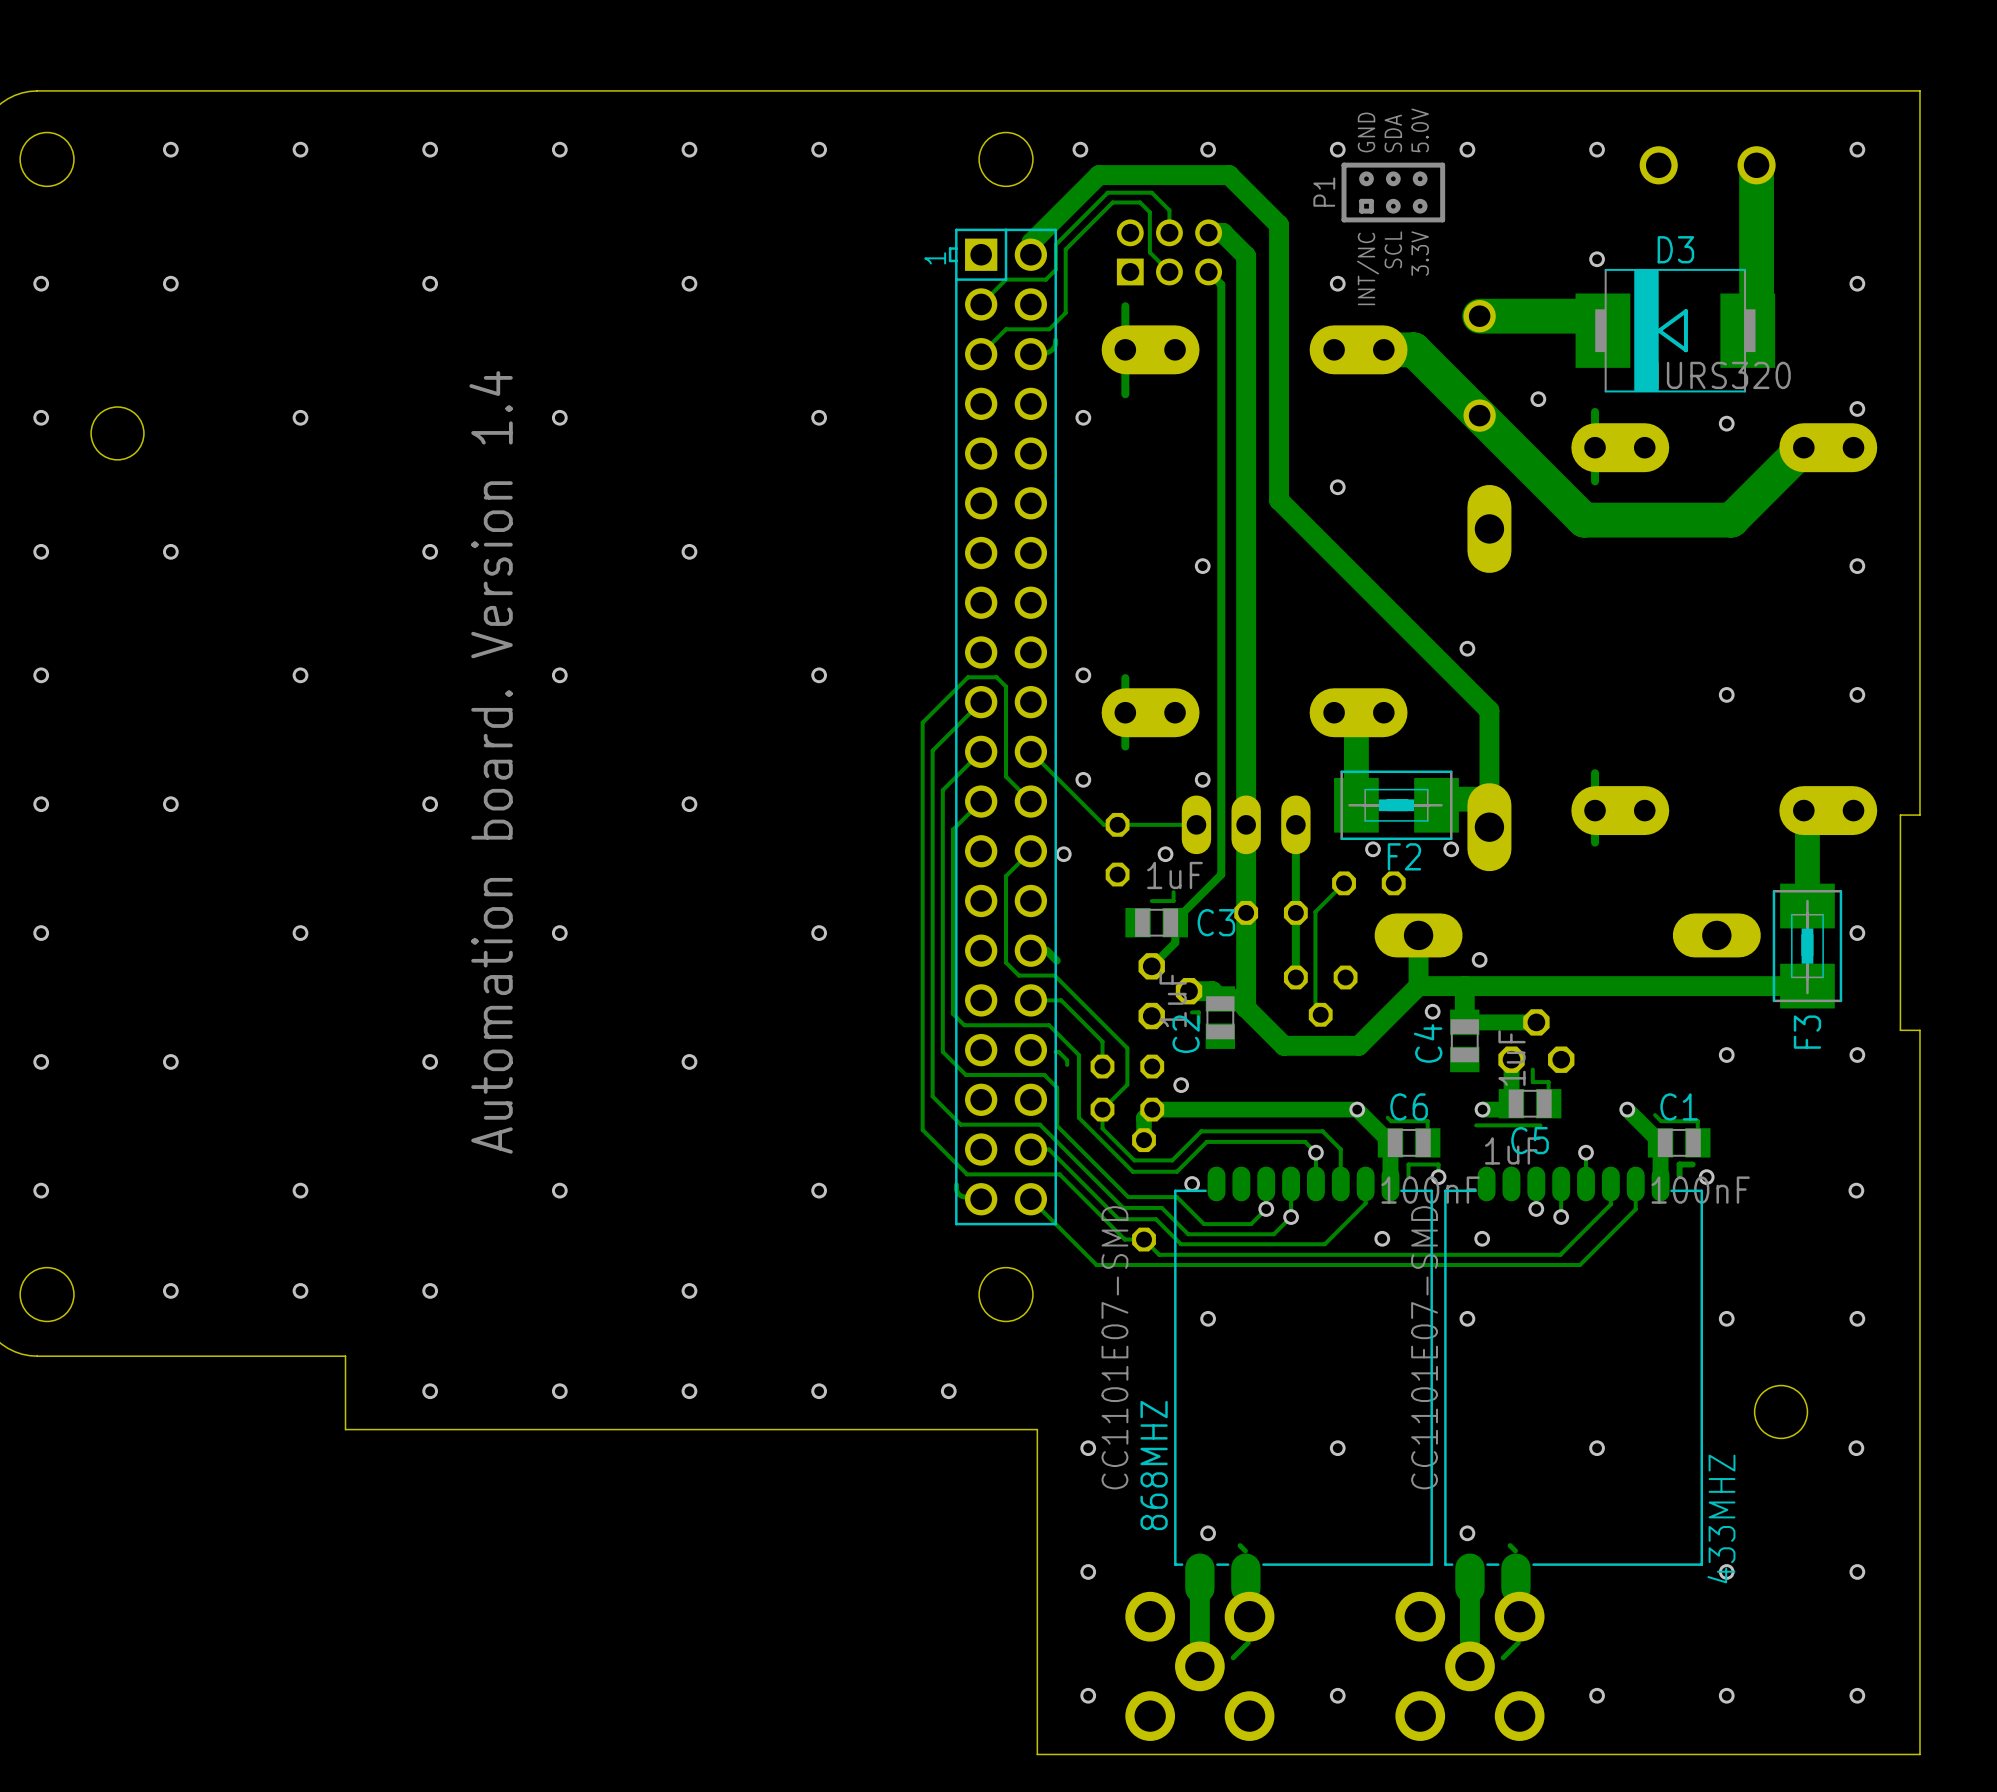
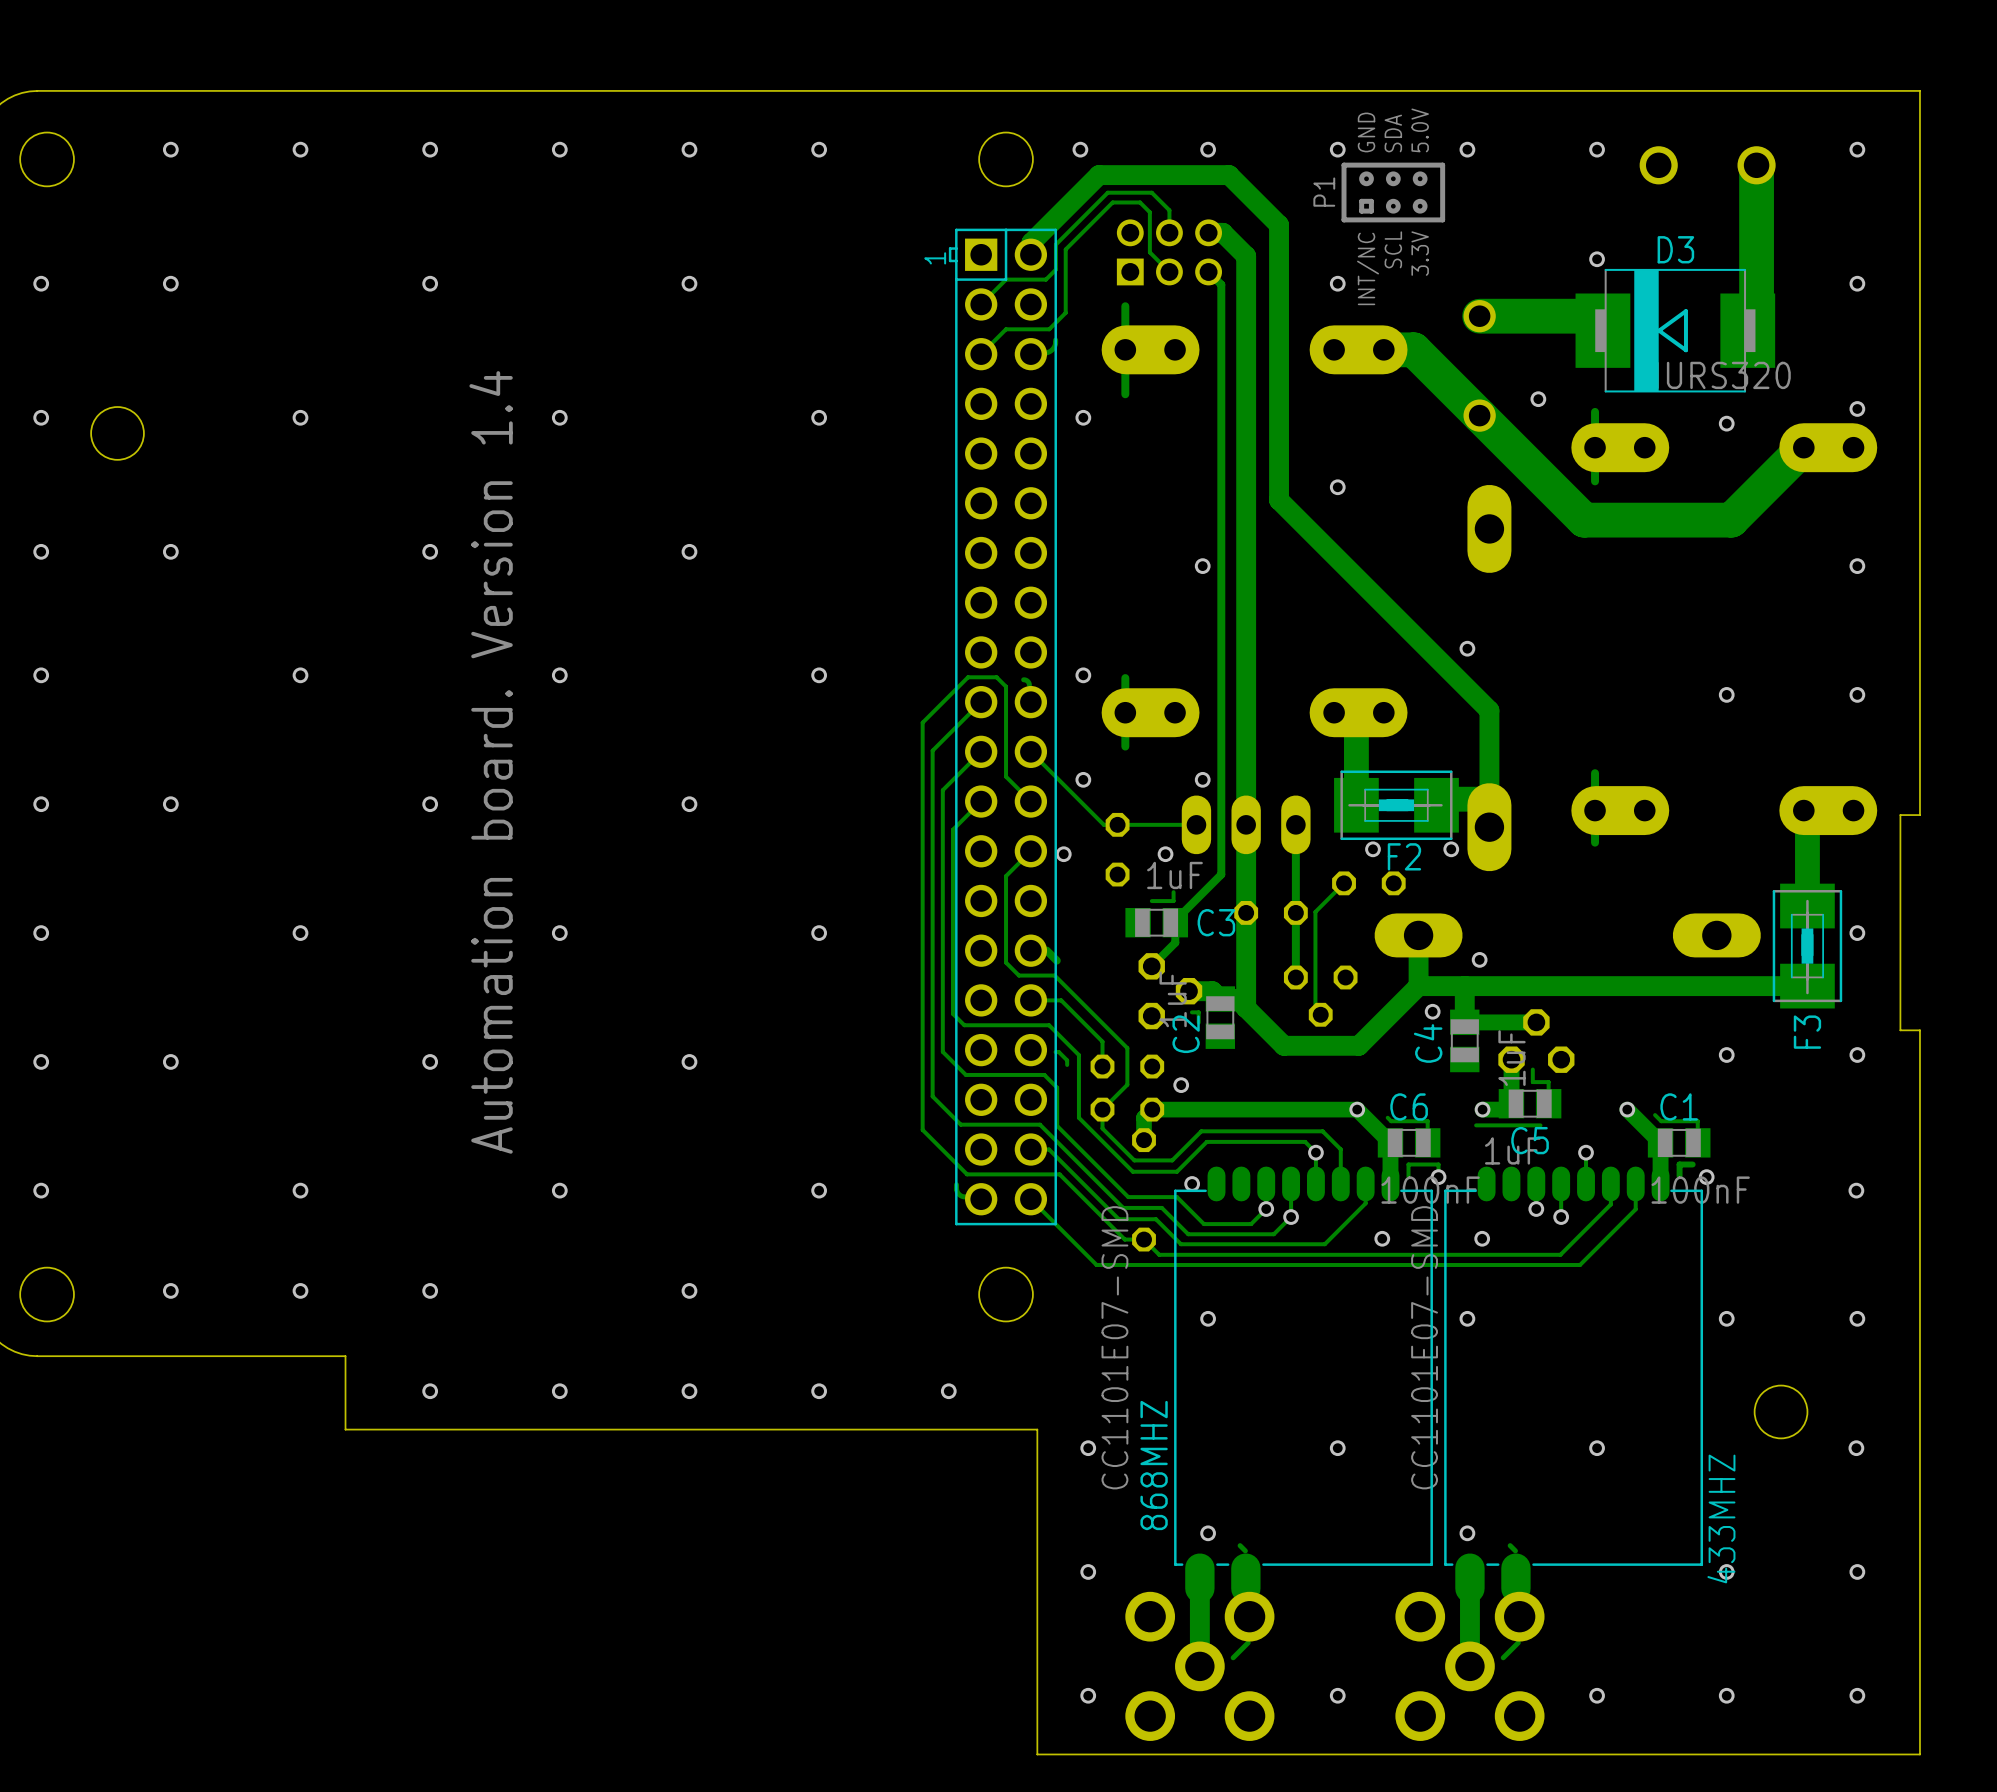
track: none -> (1023, 679) (1027, 681) (1029, 685)

